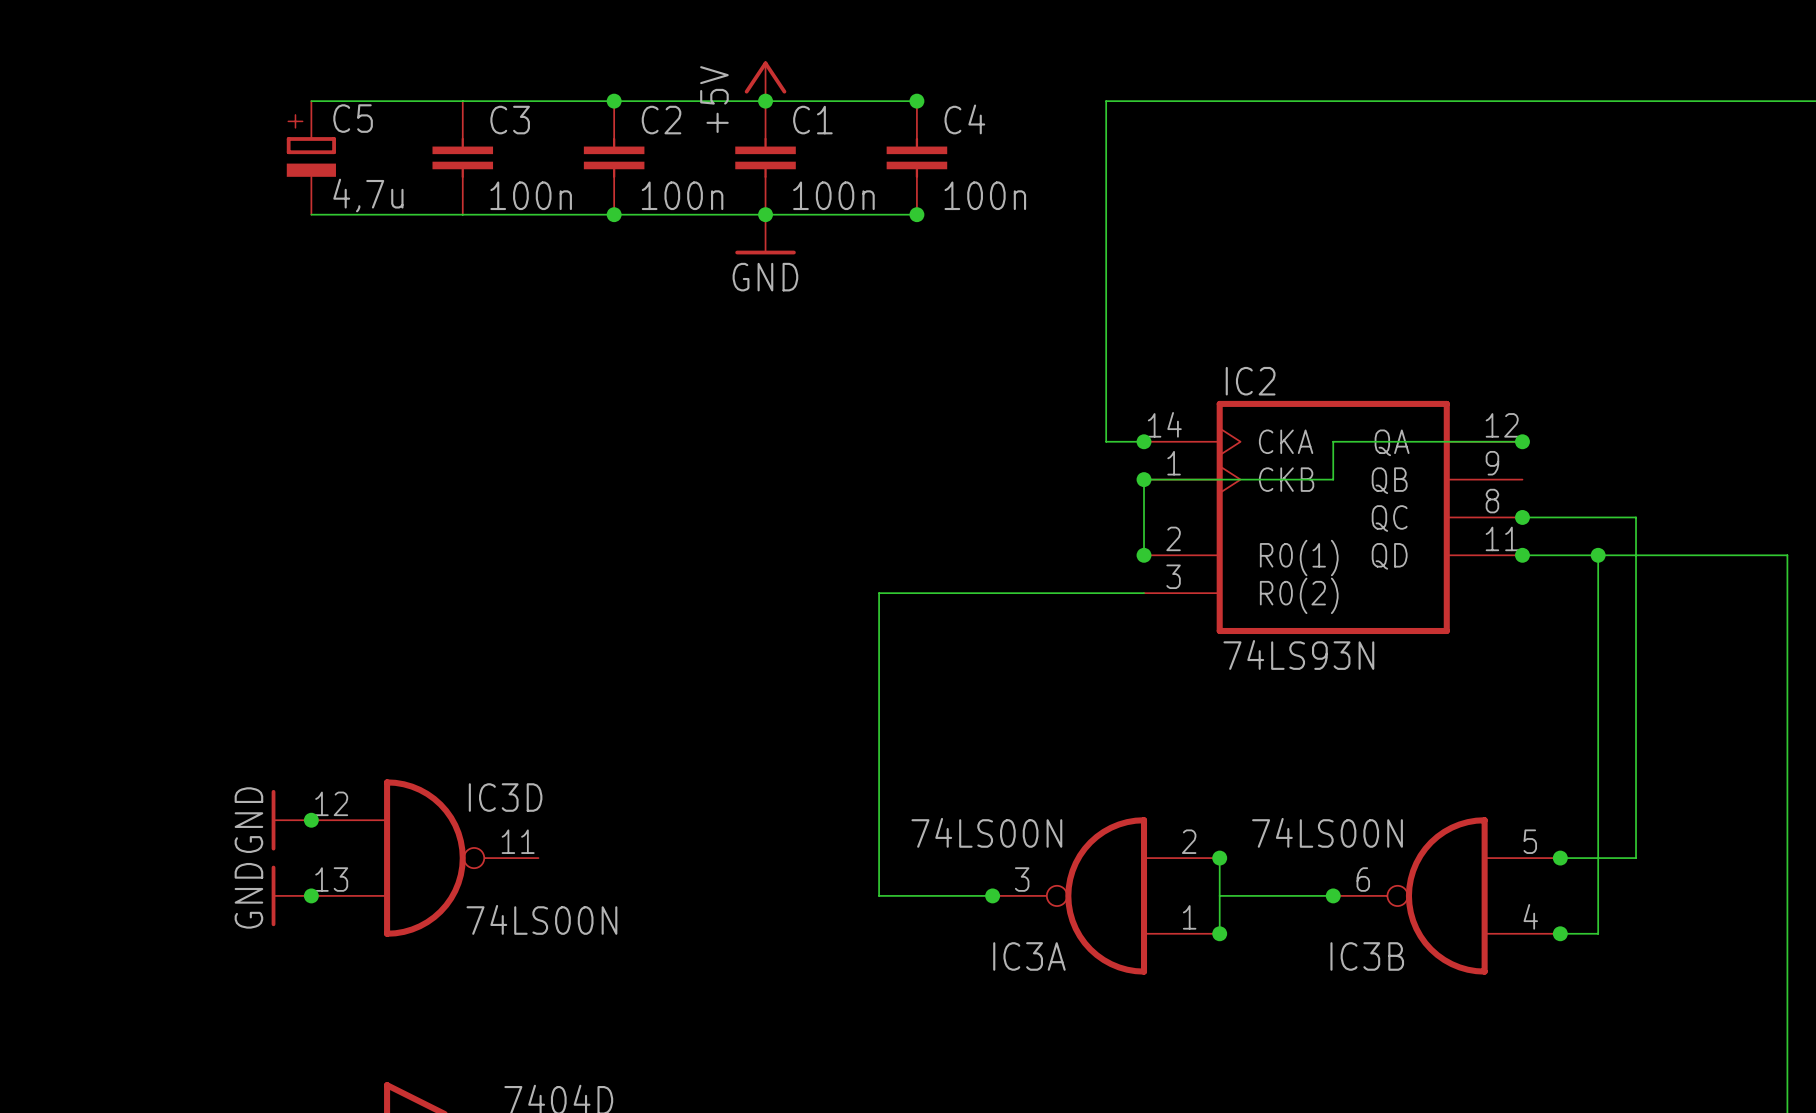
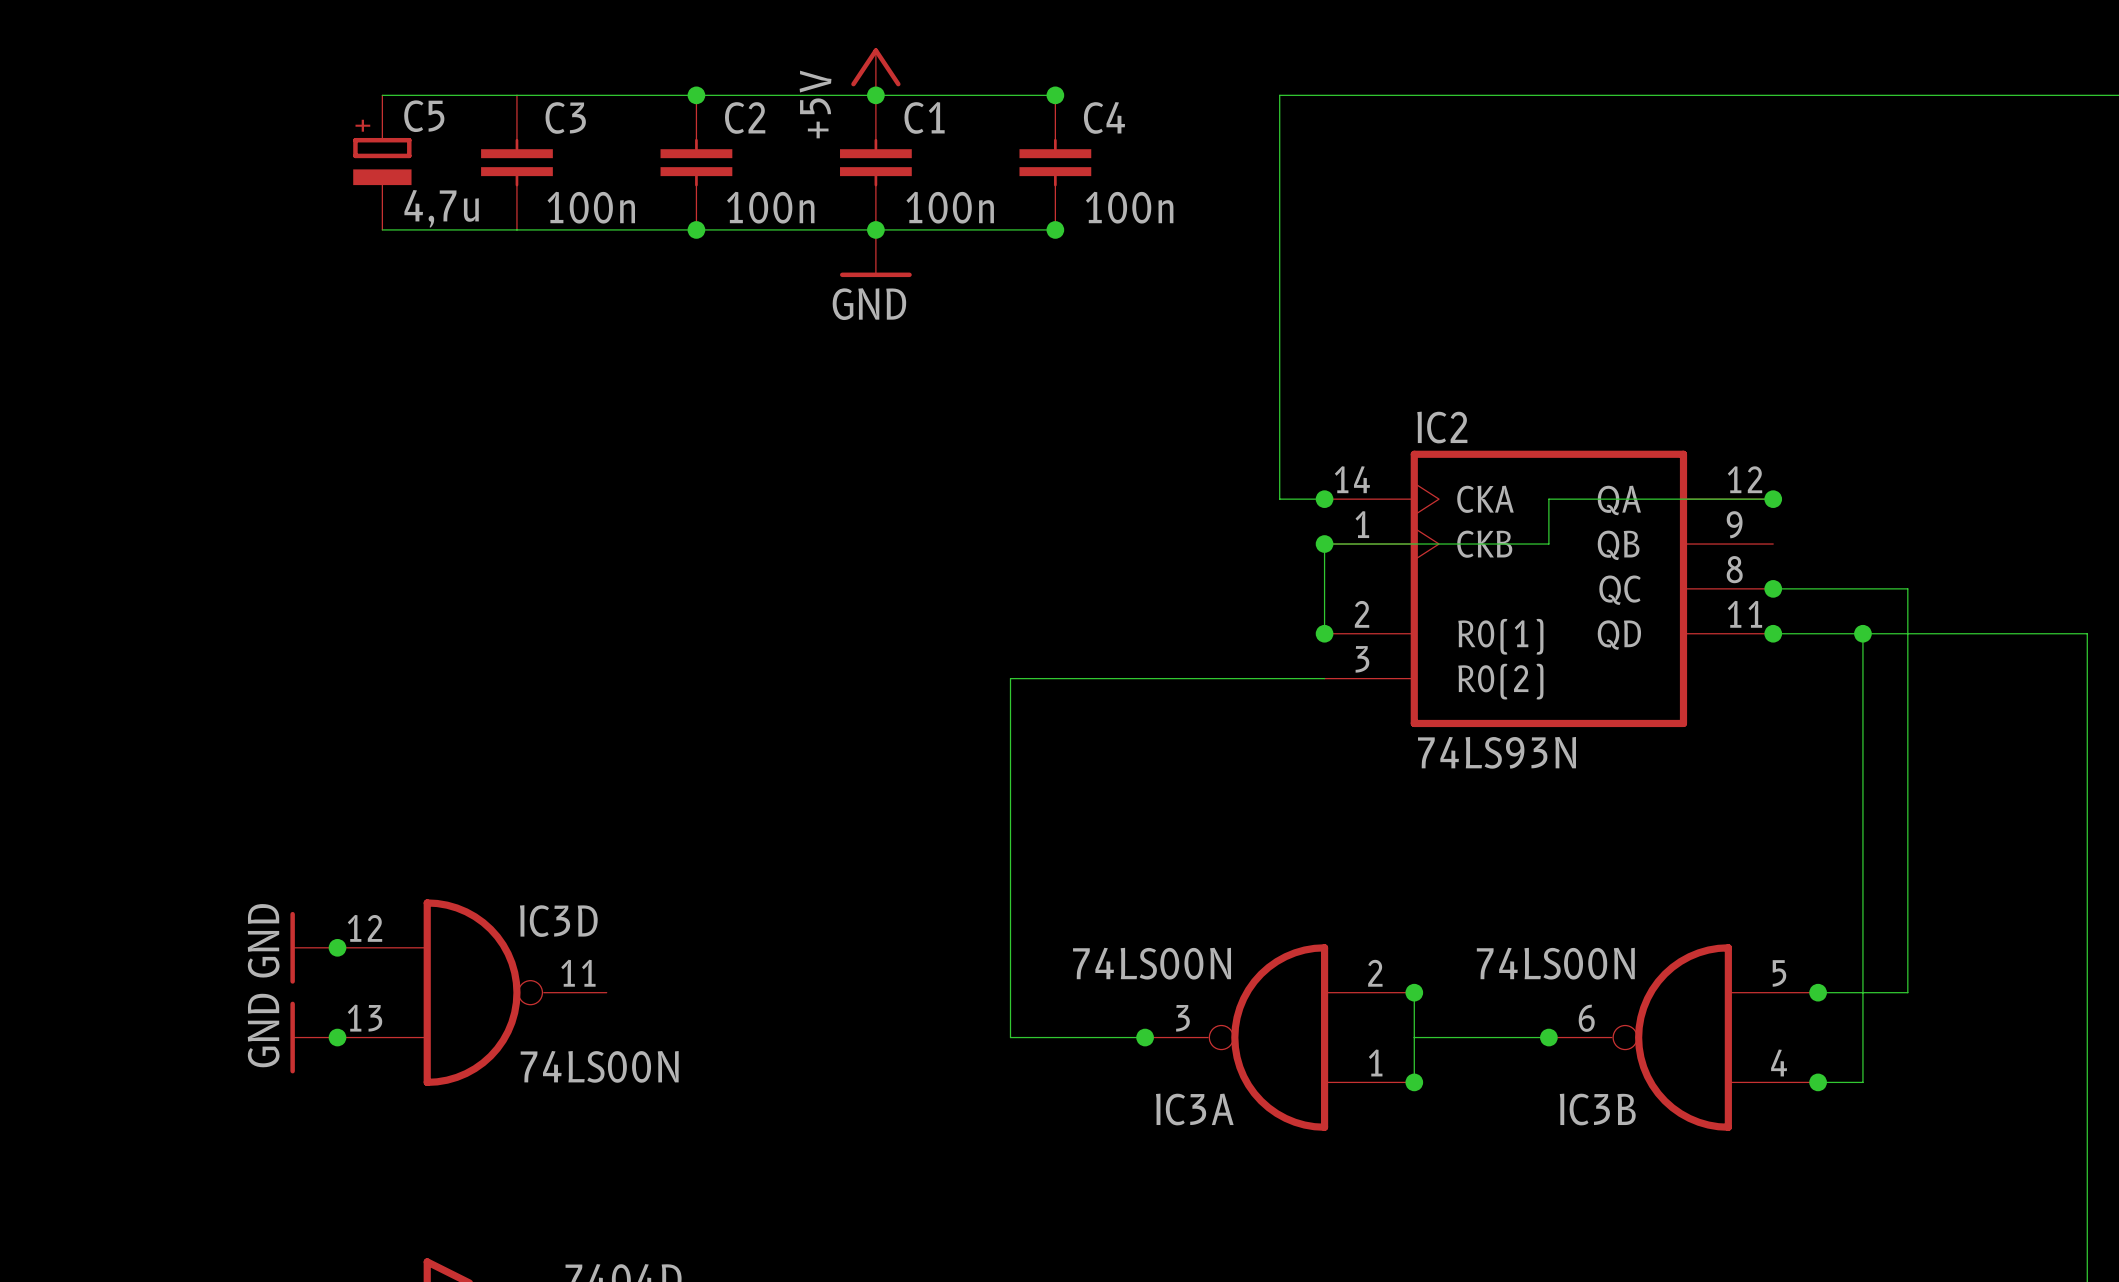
wire: (311, 101) (349, 101) -> none
C5 position: (311, 157) -> (382, 162)
wire: (311, 214) (349, 214) -> none

